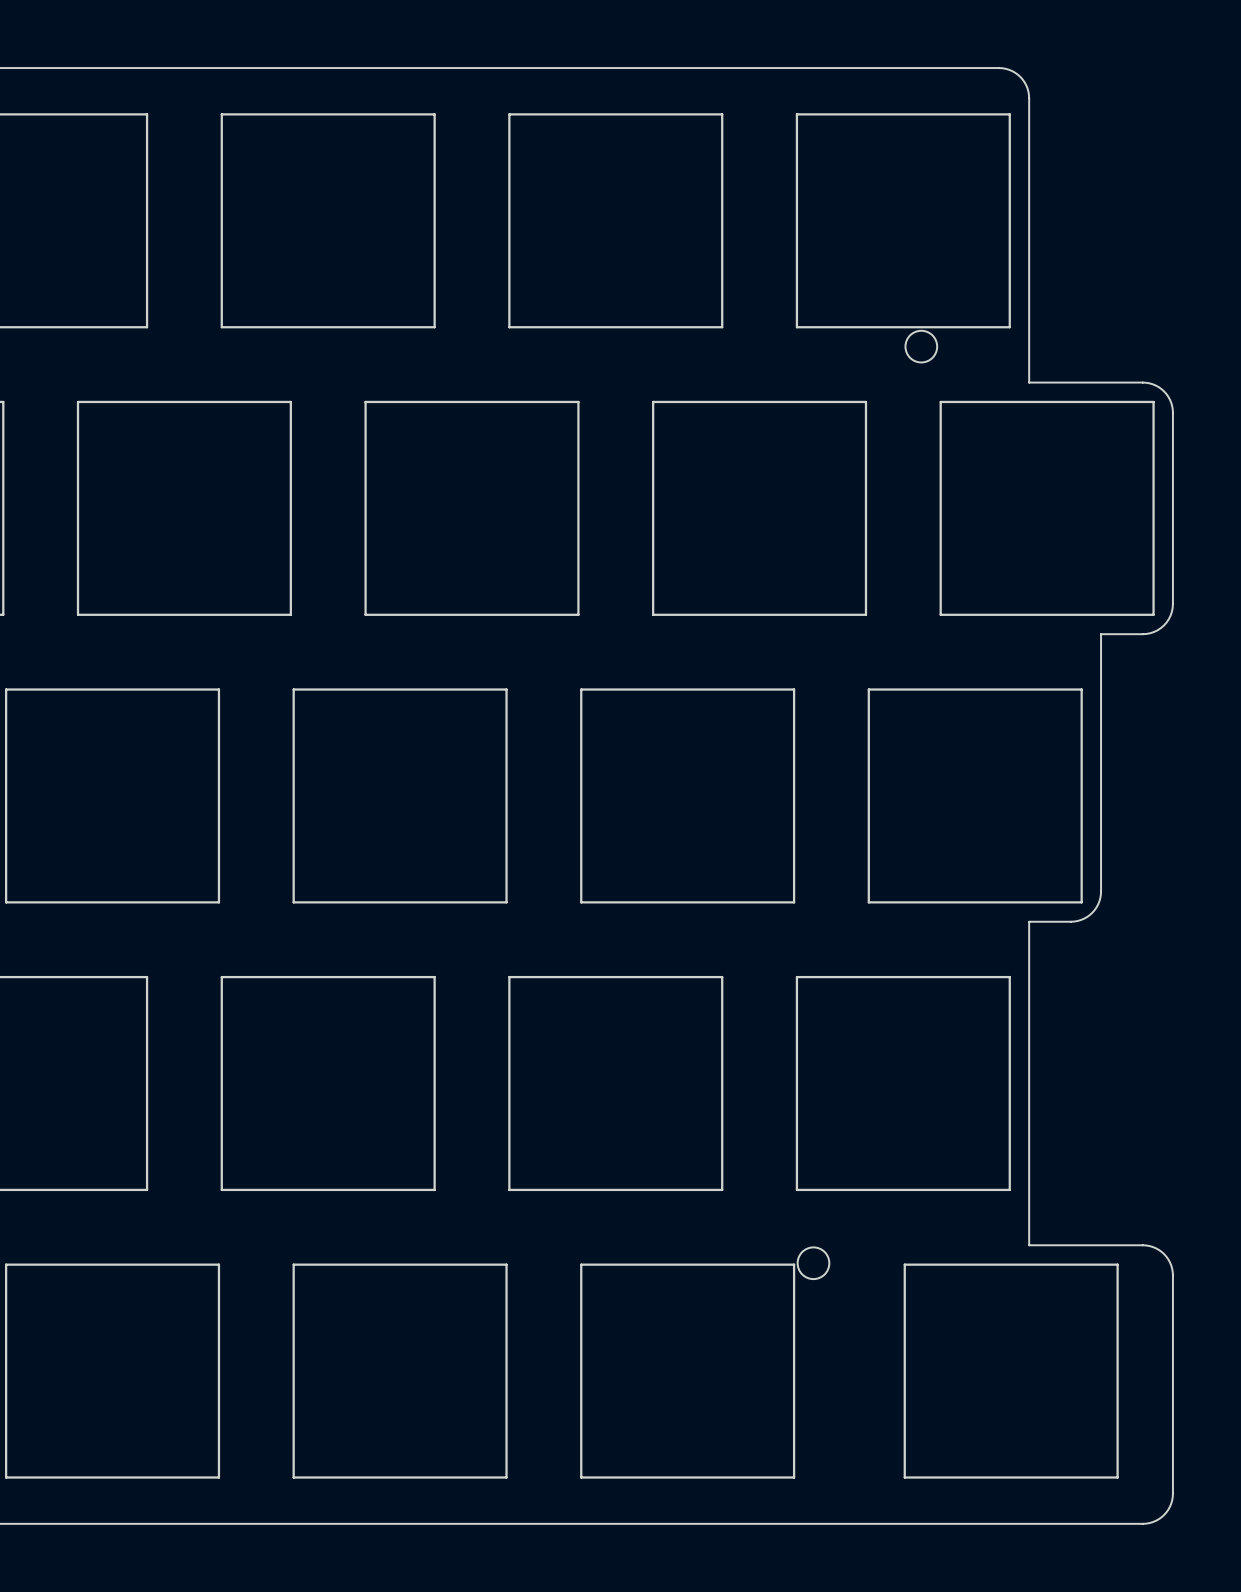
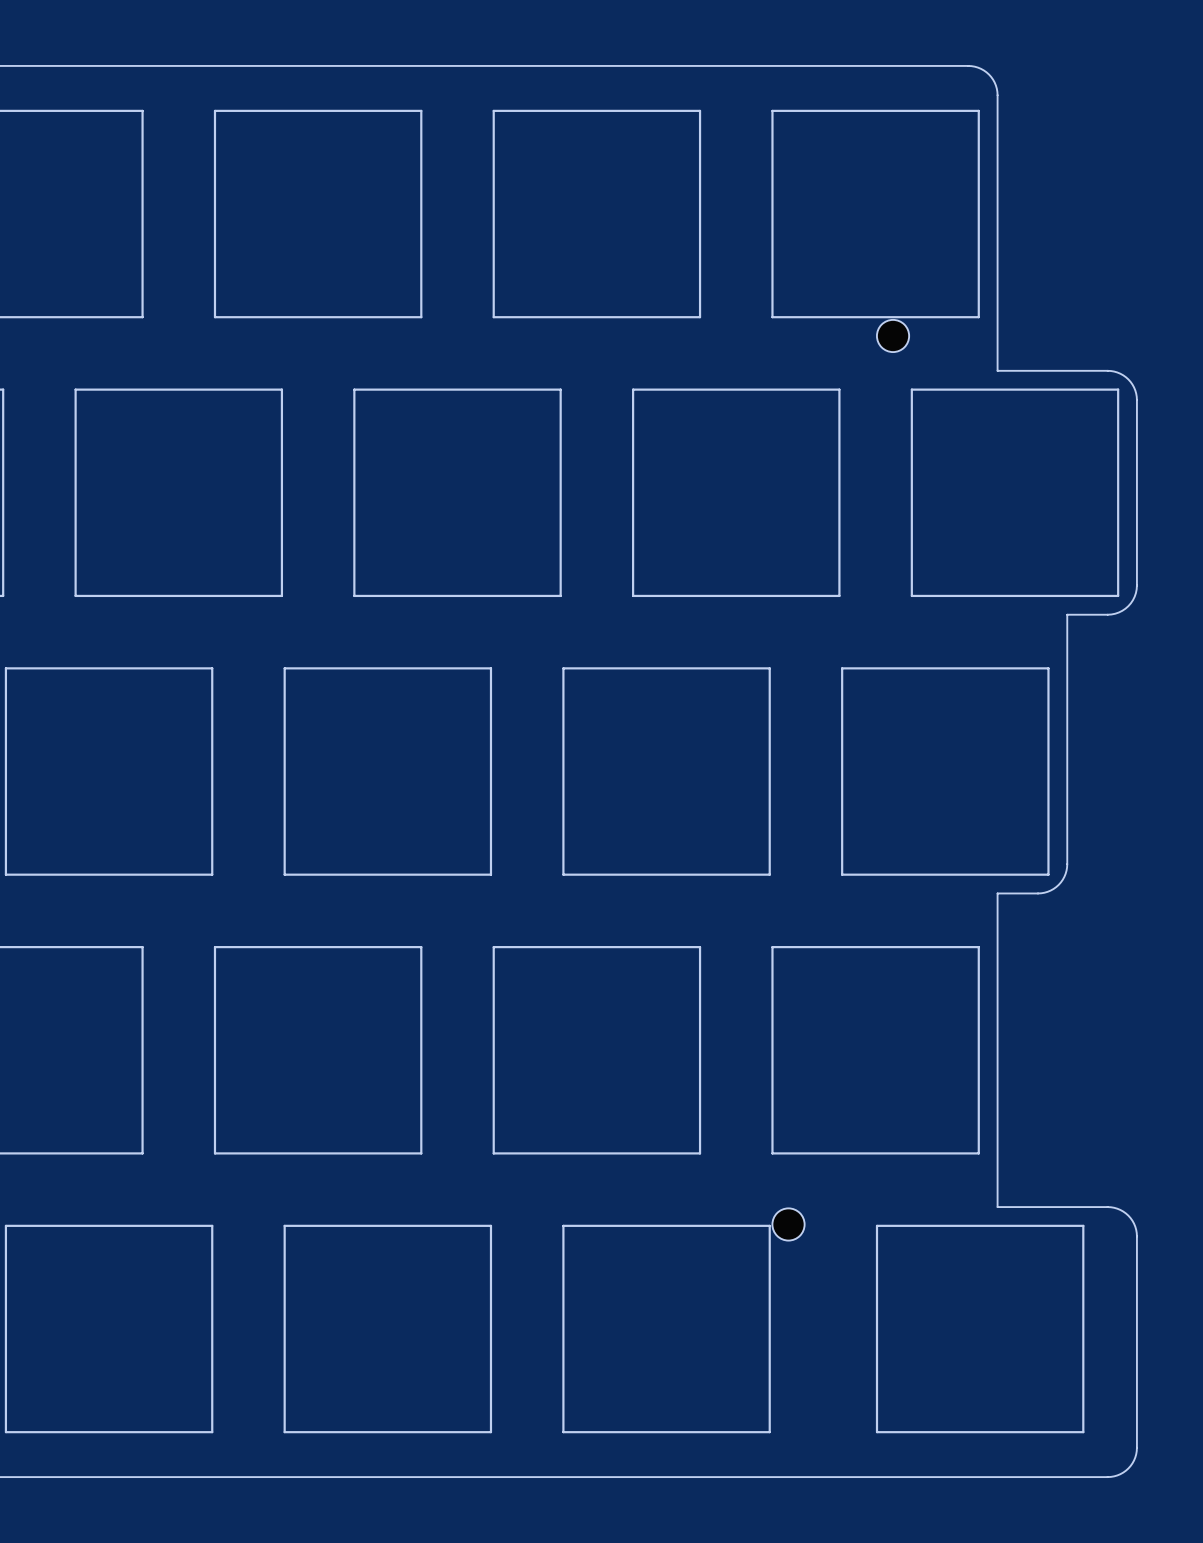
round board edge: [905, 330, 938, 363] -> none
part: none -> (893, 335)
round board edge: [797, 1247, 830, 1280] -> none
part: none -> (788, 1224)

